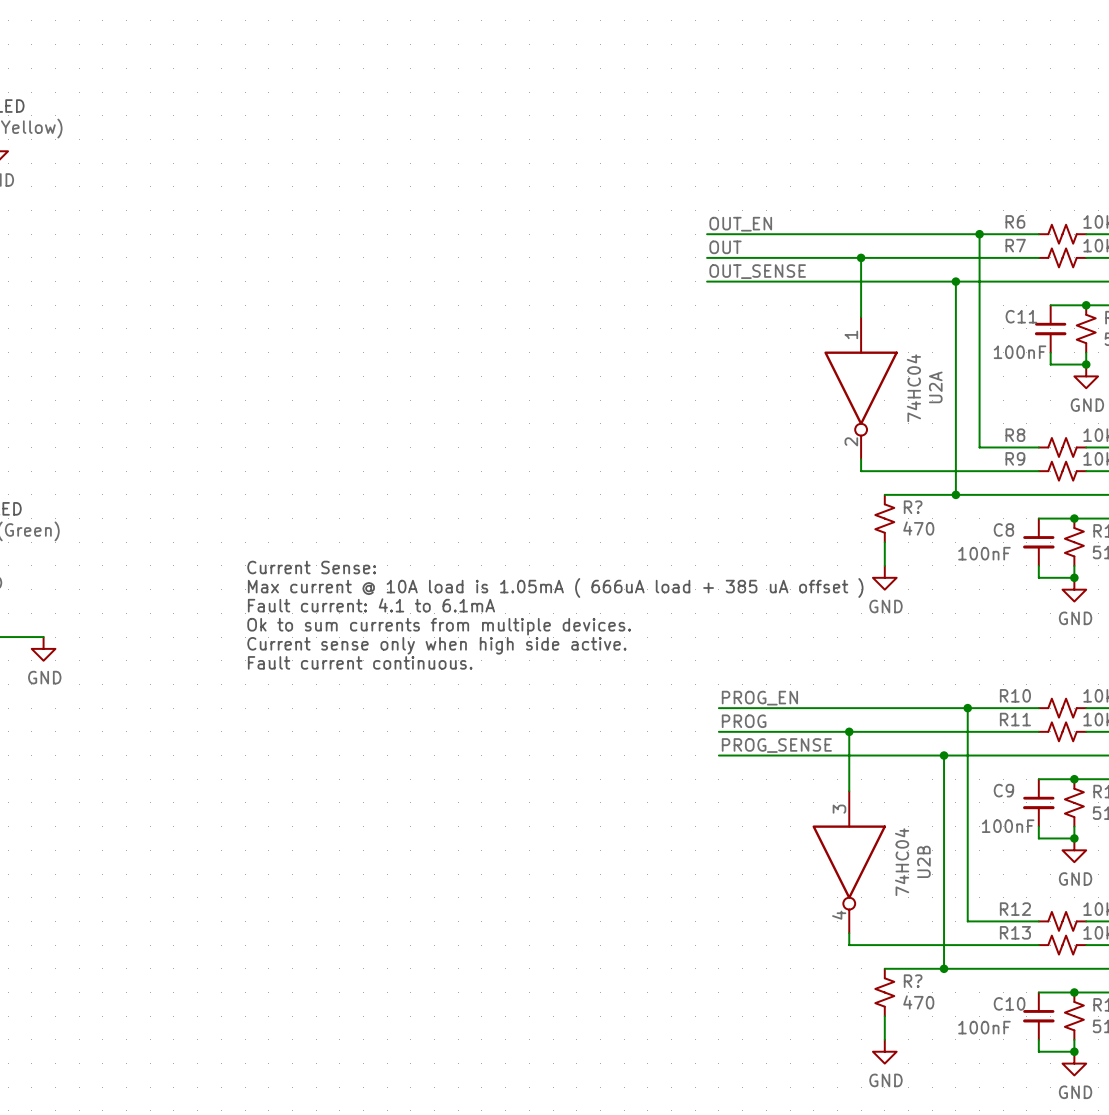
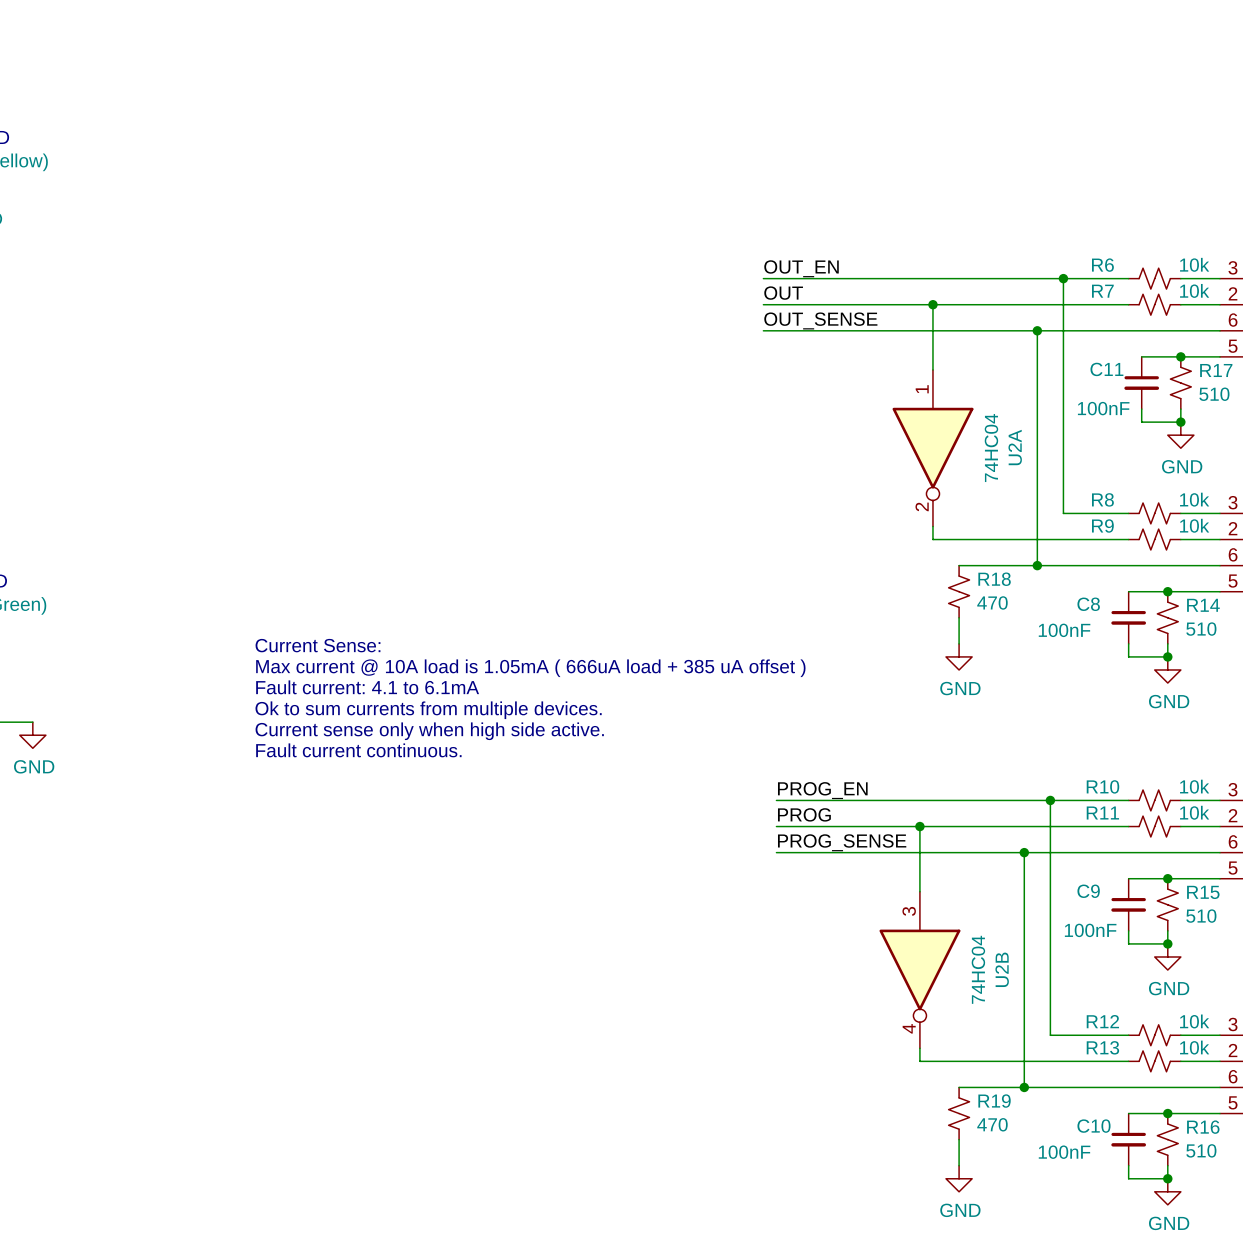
R? name: R? (913, 507) -> R18 (994, 579)
R? name: R? (913, 981) -> R19 (994, 1101)

